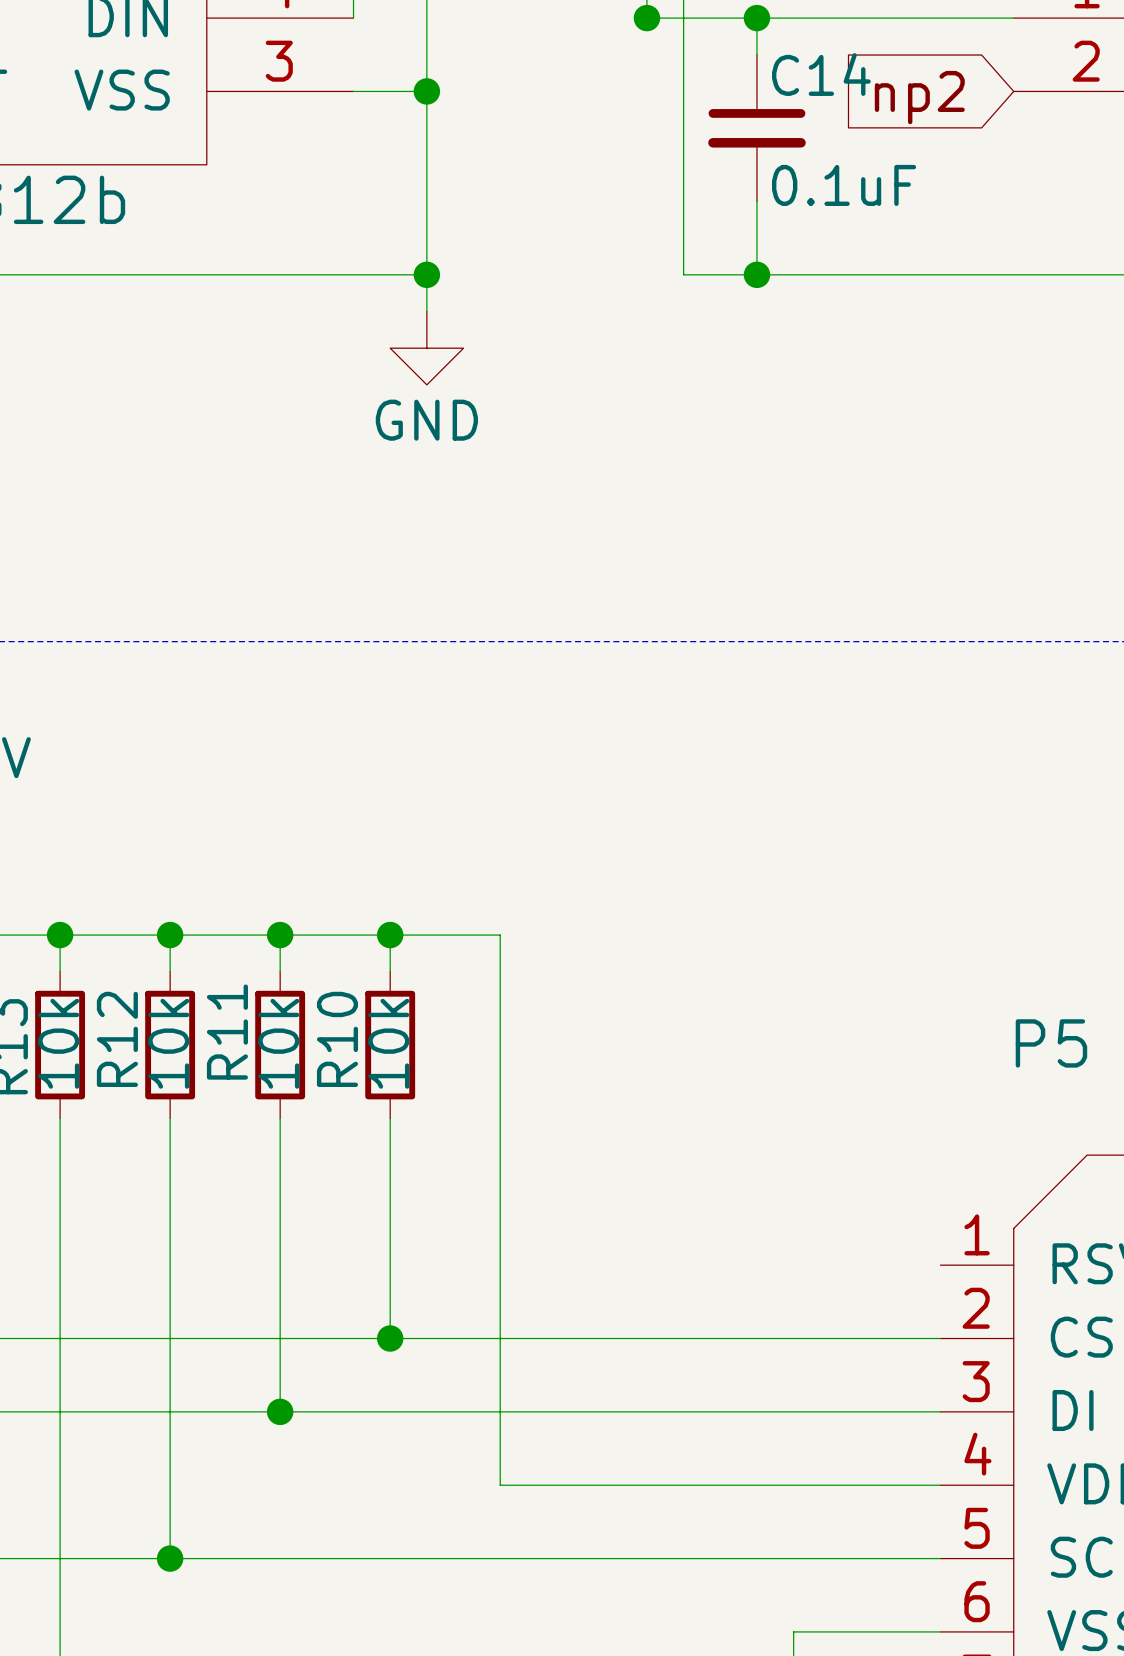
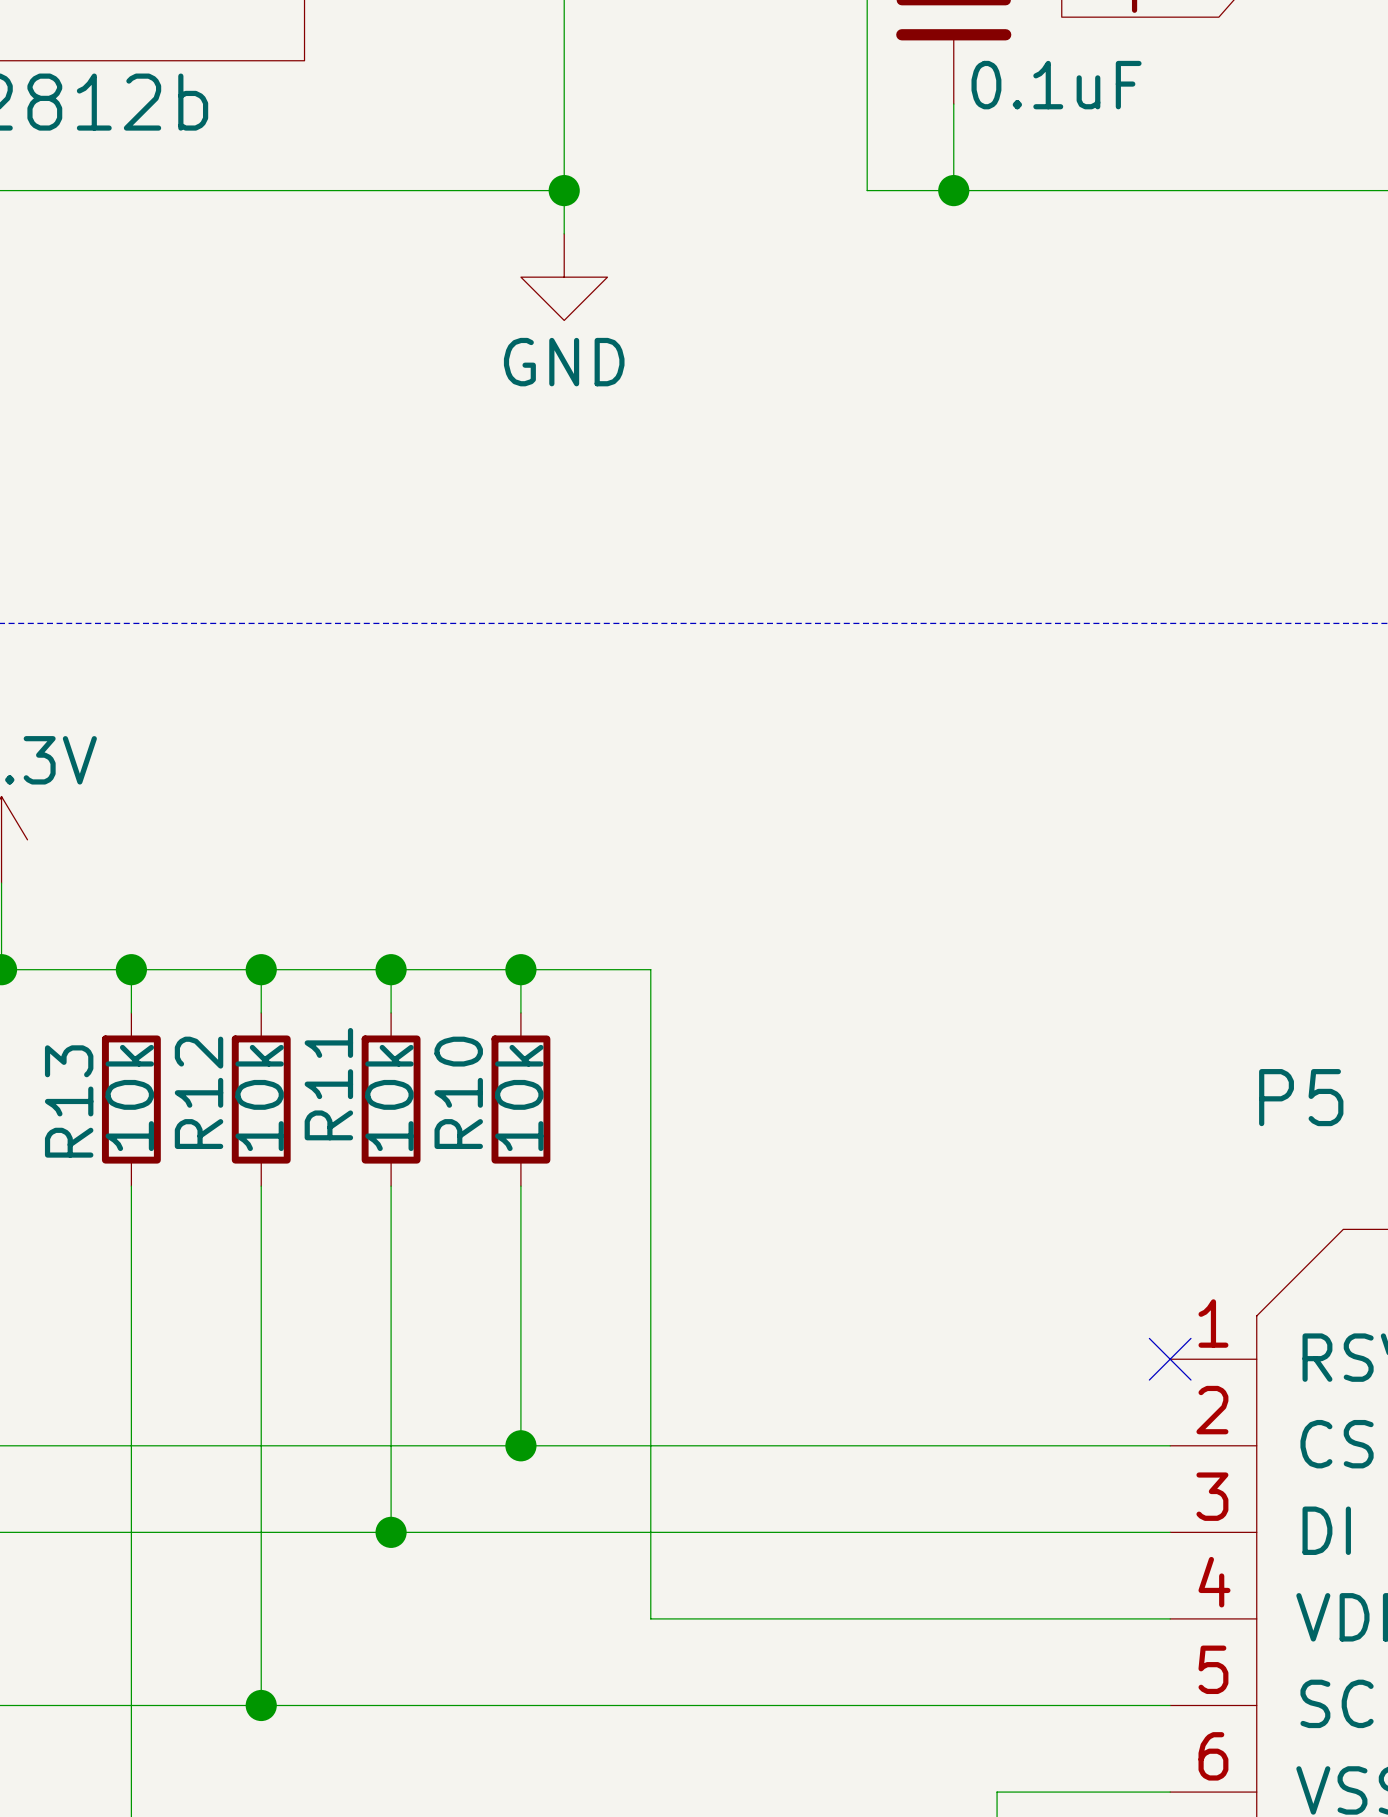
no-connect mark: none -> (1170, 1359)

